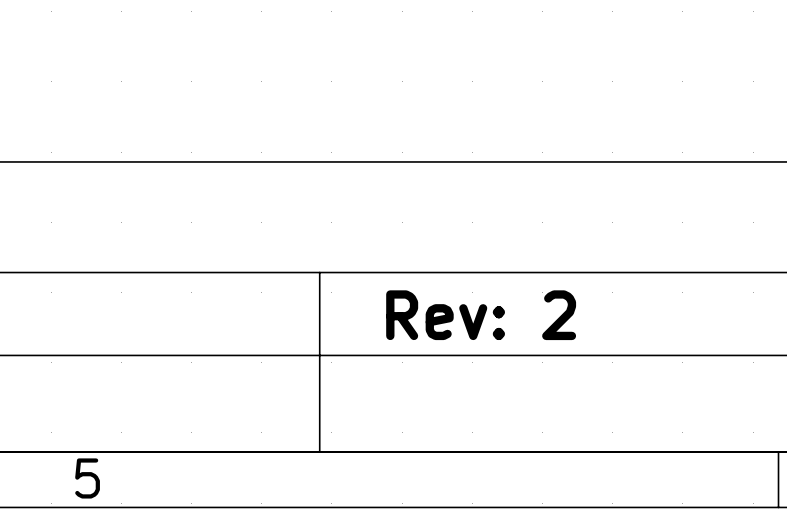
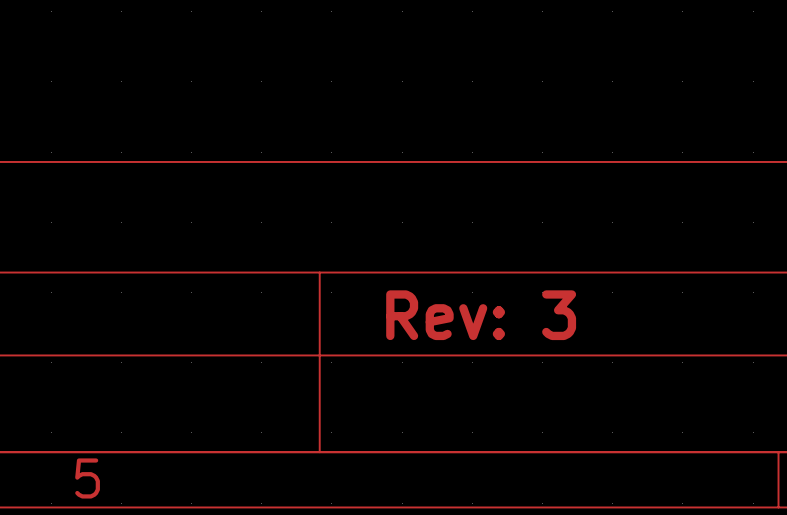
title block: Rev: 2 (481, 315) -> Rev: 3 (481, 315)

